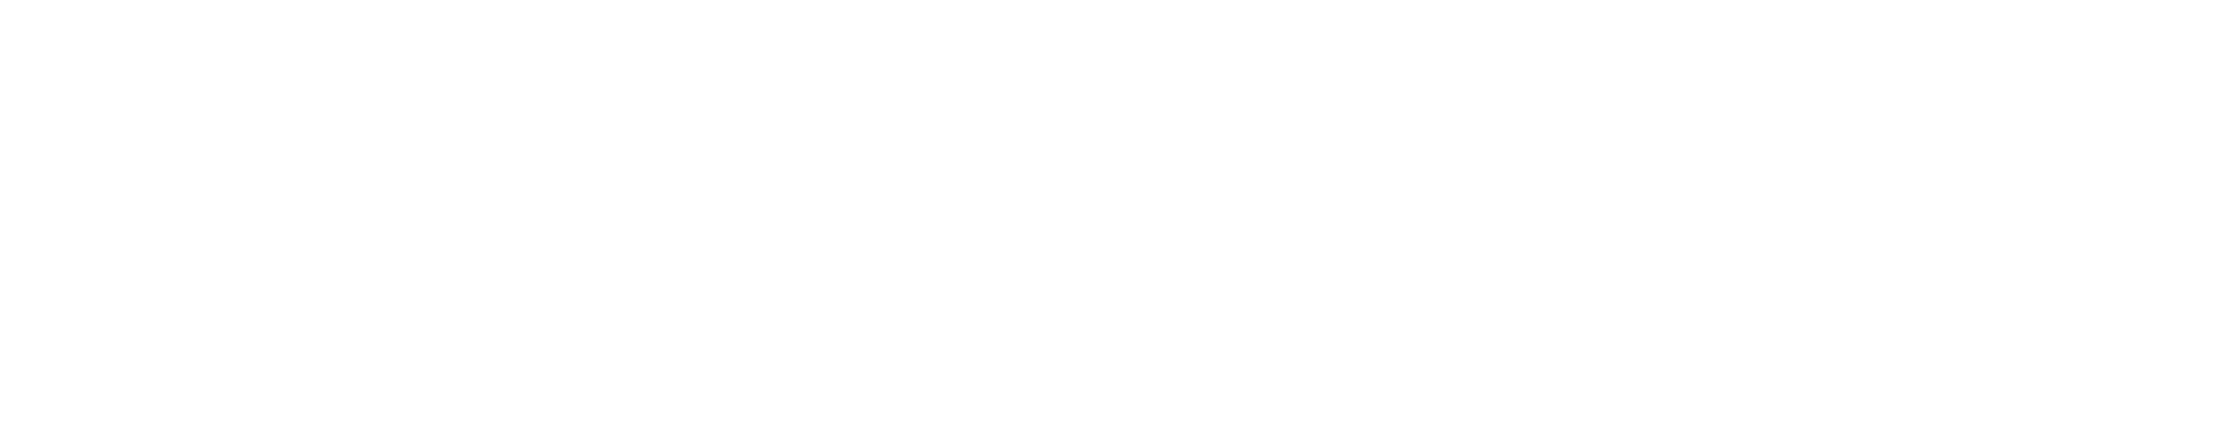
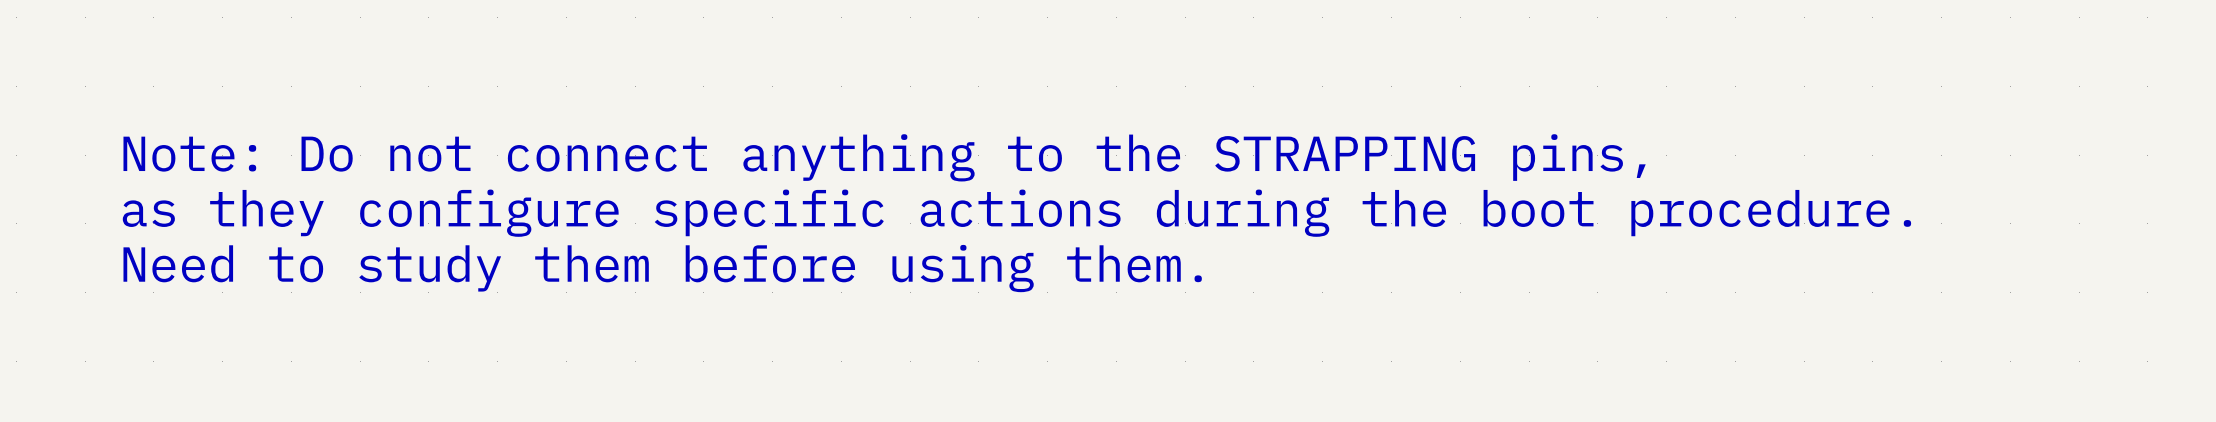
text: none -> Note: Do not connect anything to the STRAPPING pins, (884, 157)
text: none -> as they configure specific actions during the boot procedure. (1016, 213)
text: none -> Need to study them before using them. (662, 268)

